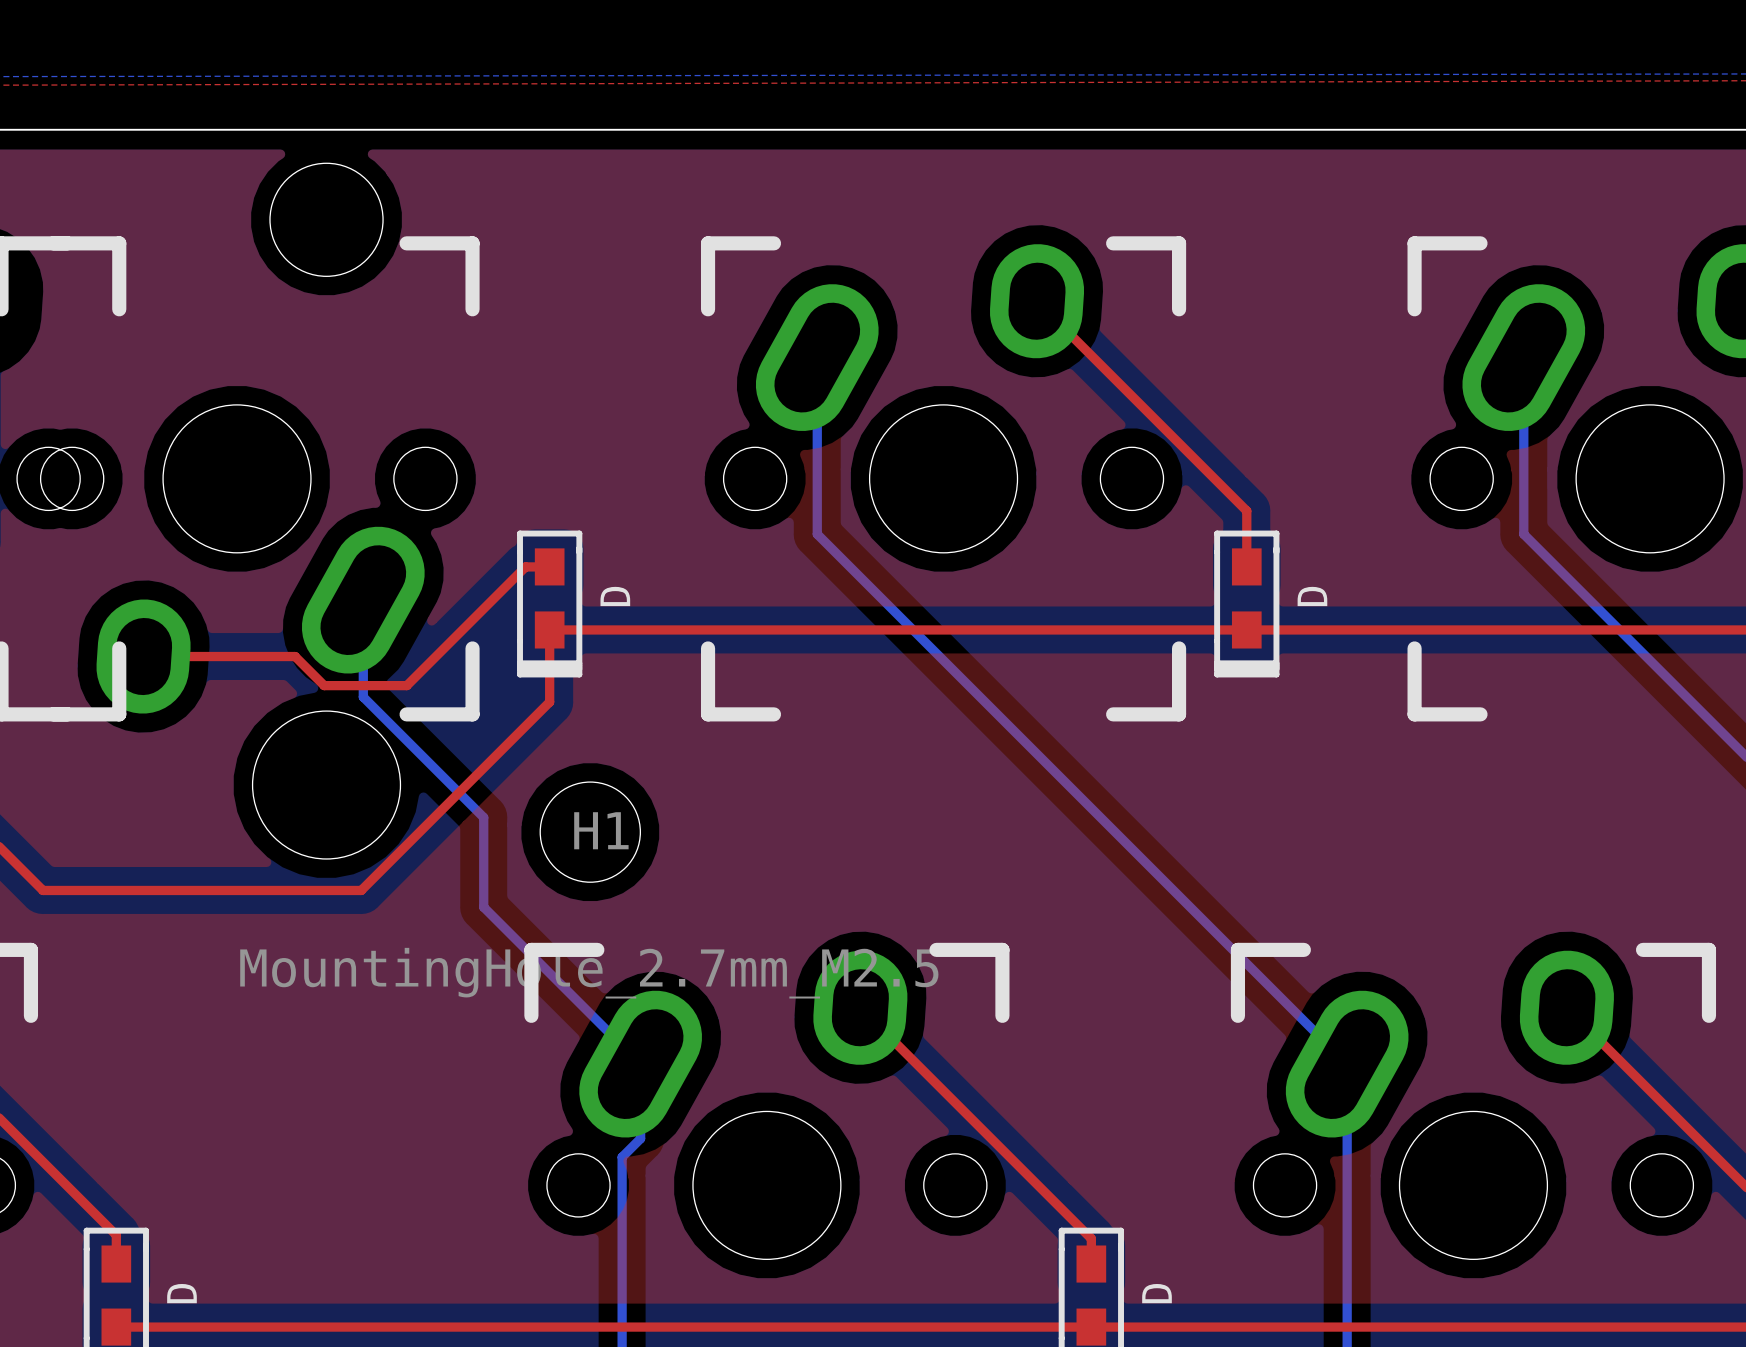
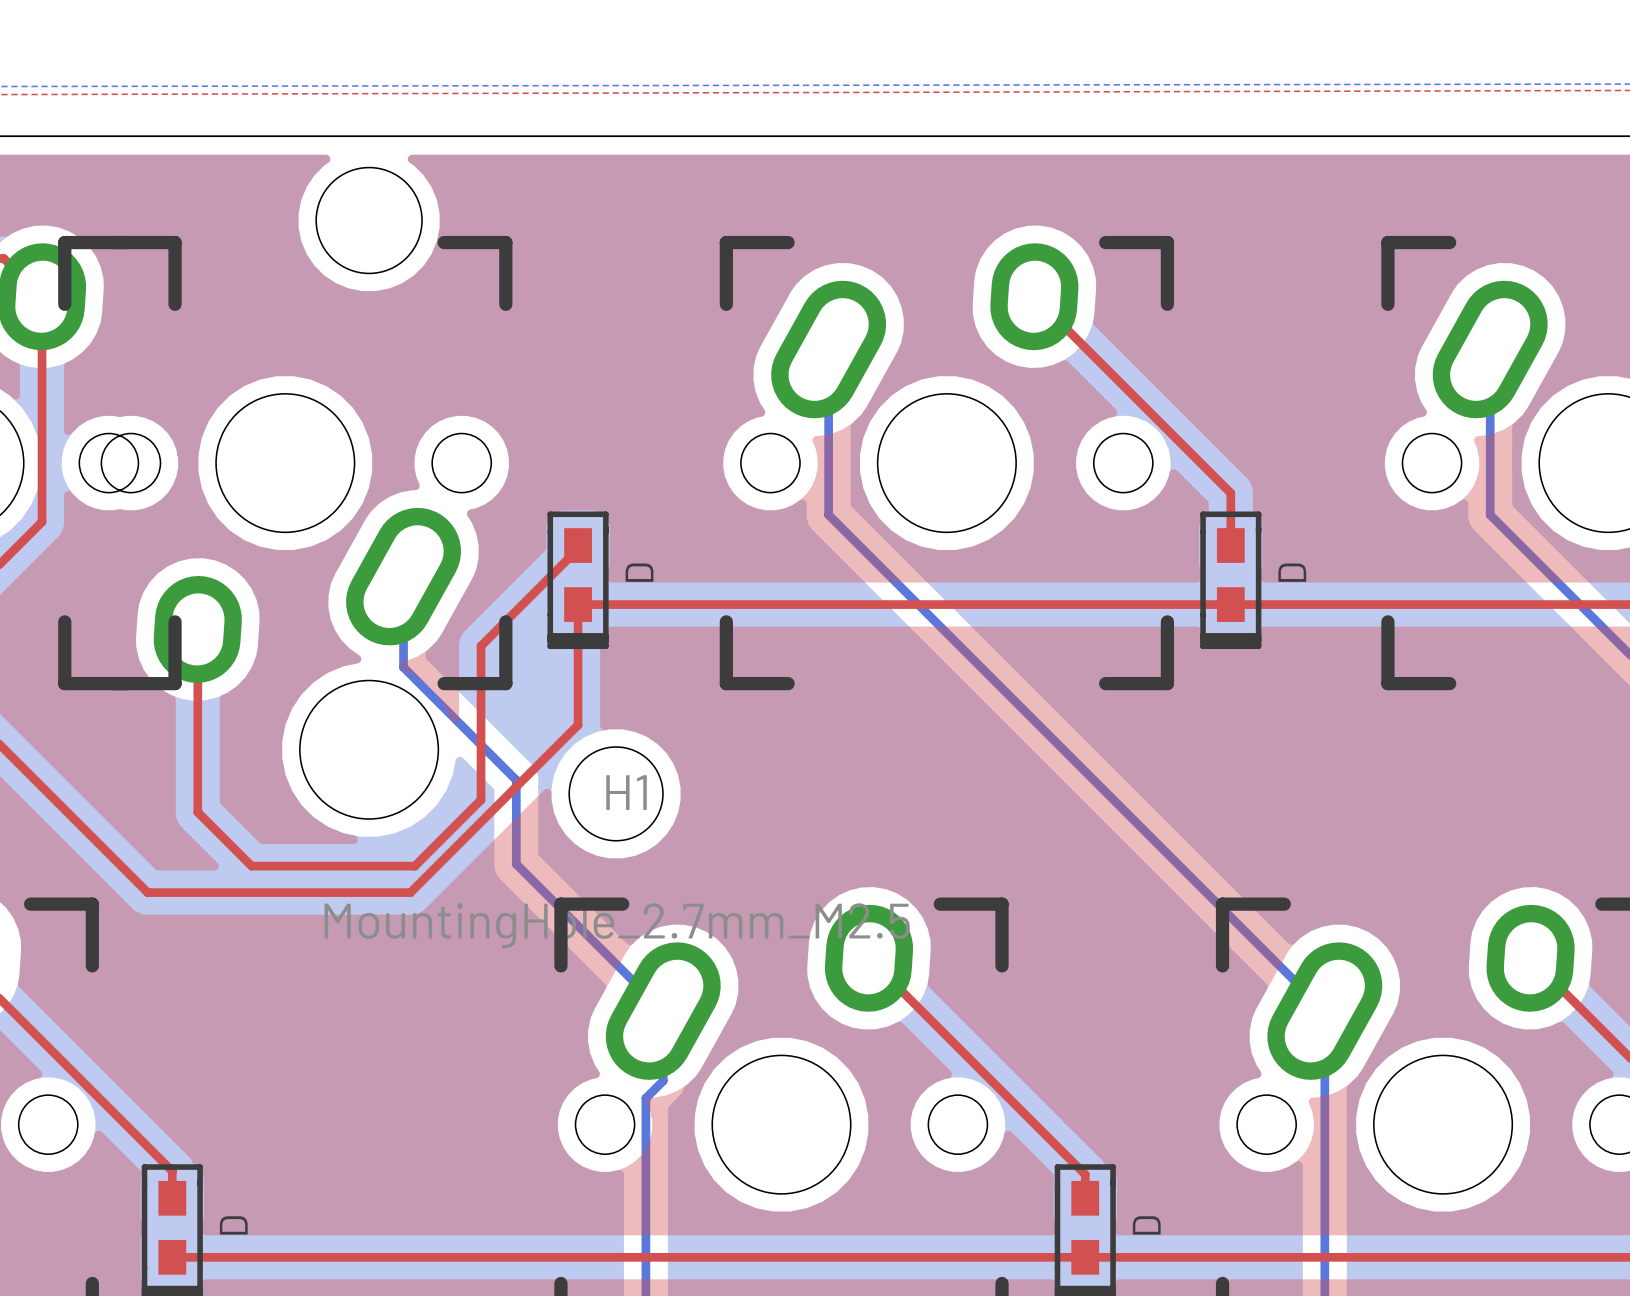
top track: (549, 566) (525, 566) (406, 685) (324, 685) (295, 656) (143, 656) -> (578, 545) (578, 549) (481, 646) (481, 799) (414, 866) (251, 866) (197, 812) (197, 629)
top track: (549, 702) (361, 890) (42, 890) -> (578, 672) (578, 725) (410, 892) (147, 892) (103, 848)

